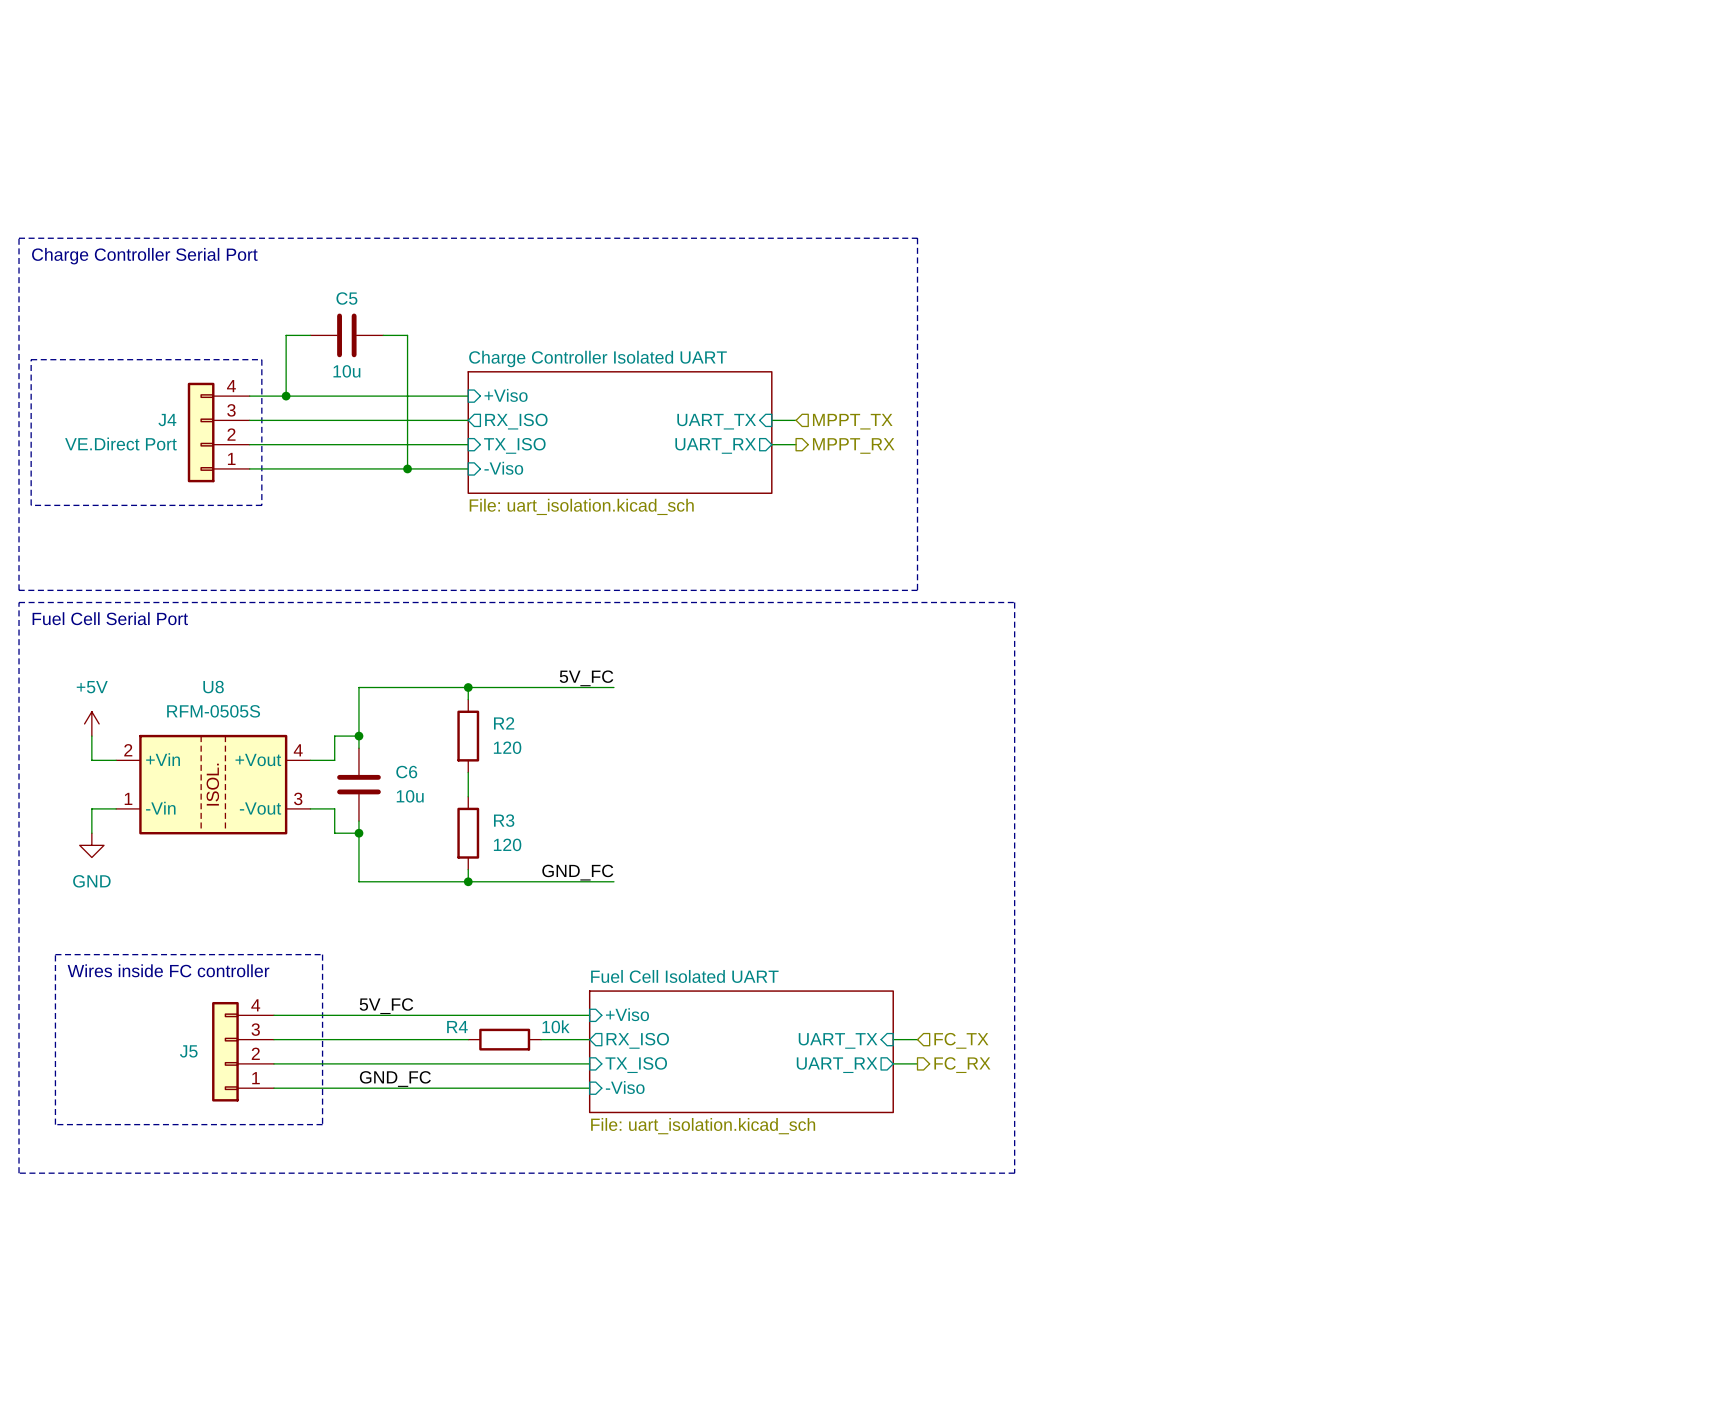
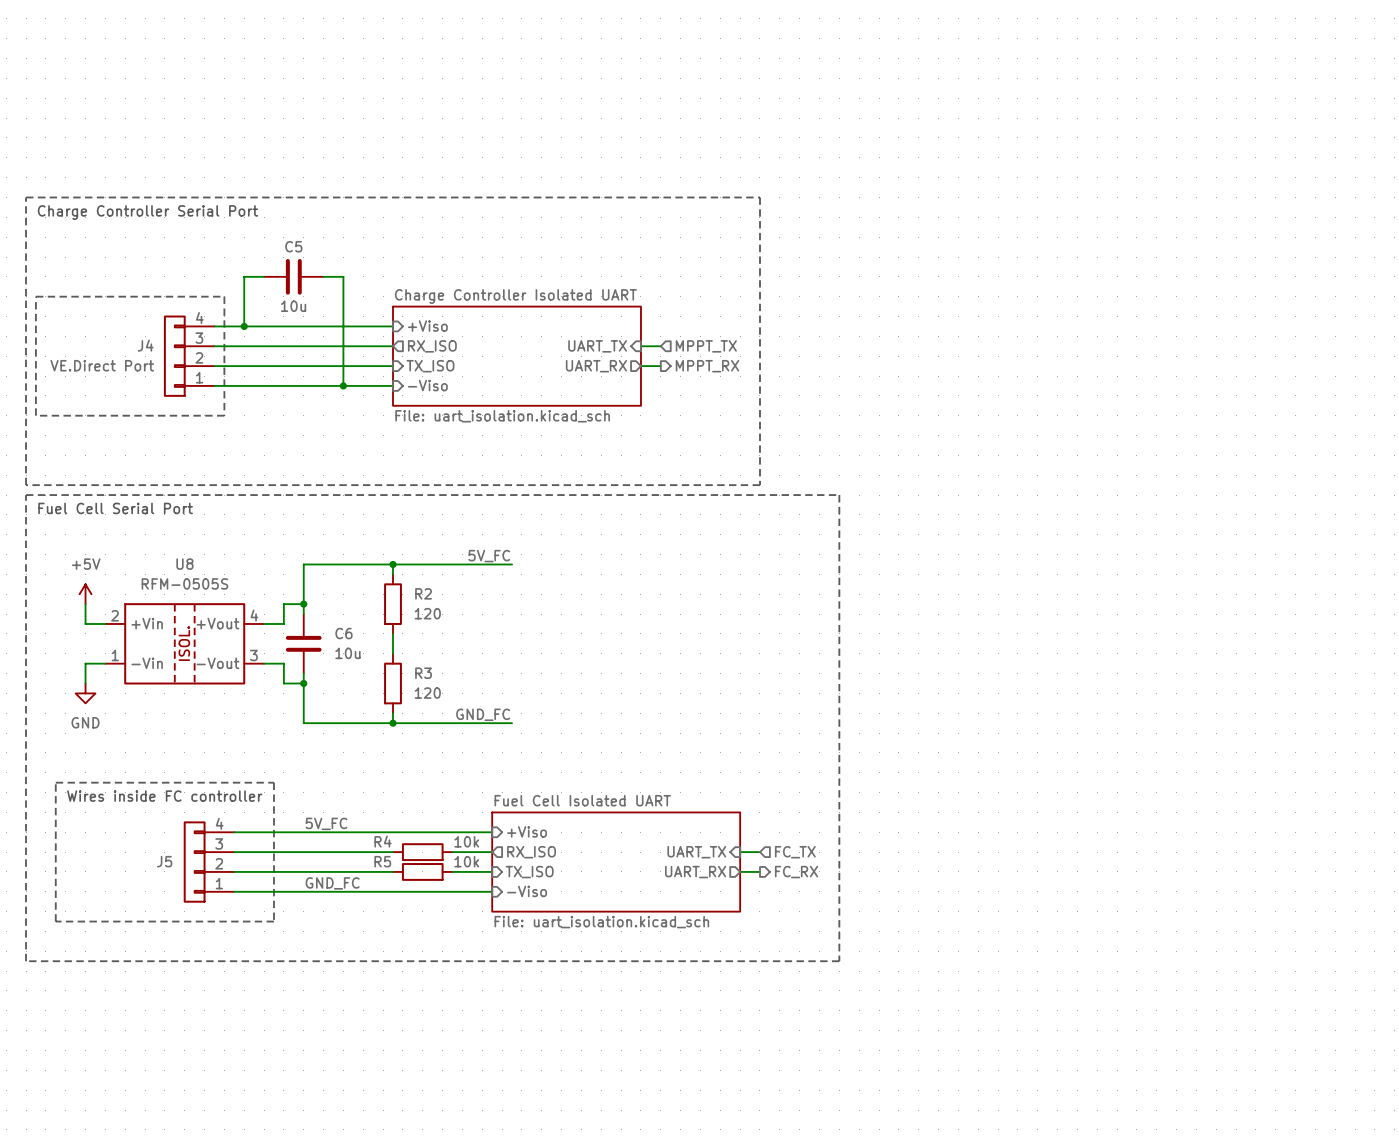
wire: (468, 1063) (541, 1063) -> none
R5: none -> 10k (422, 871)

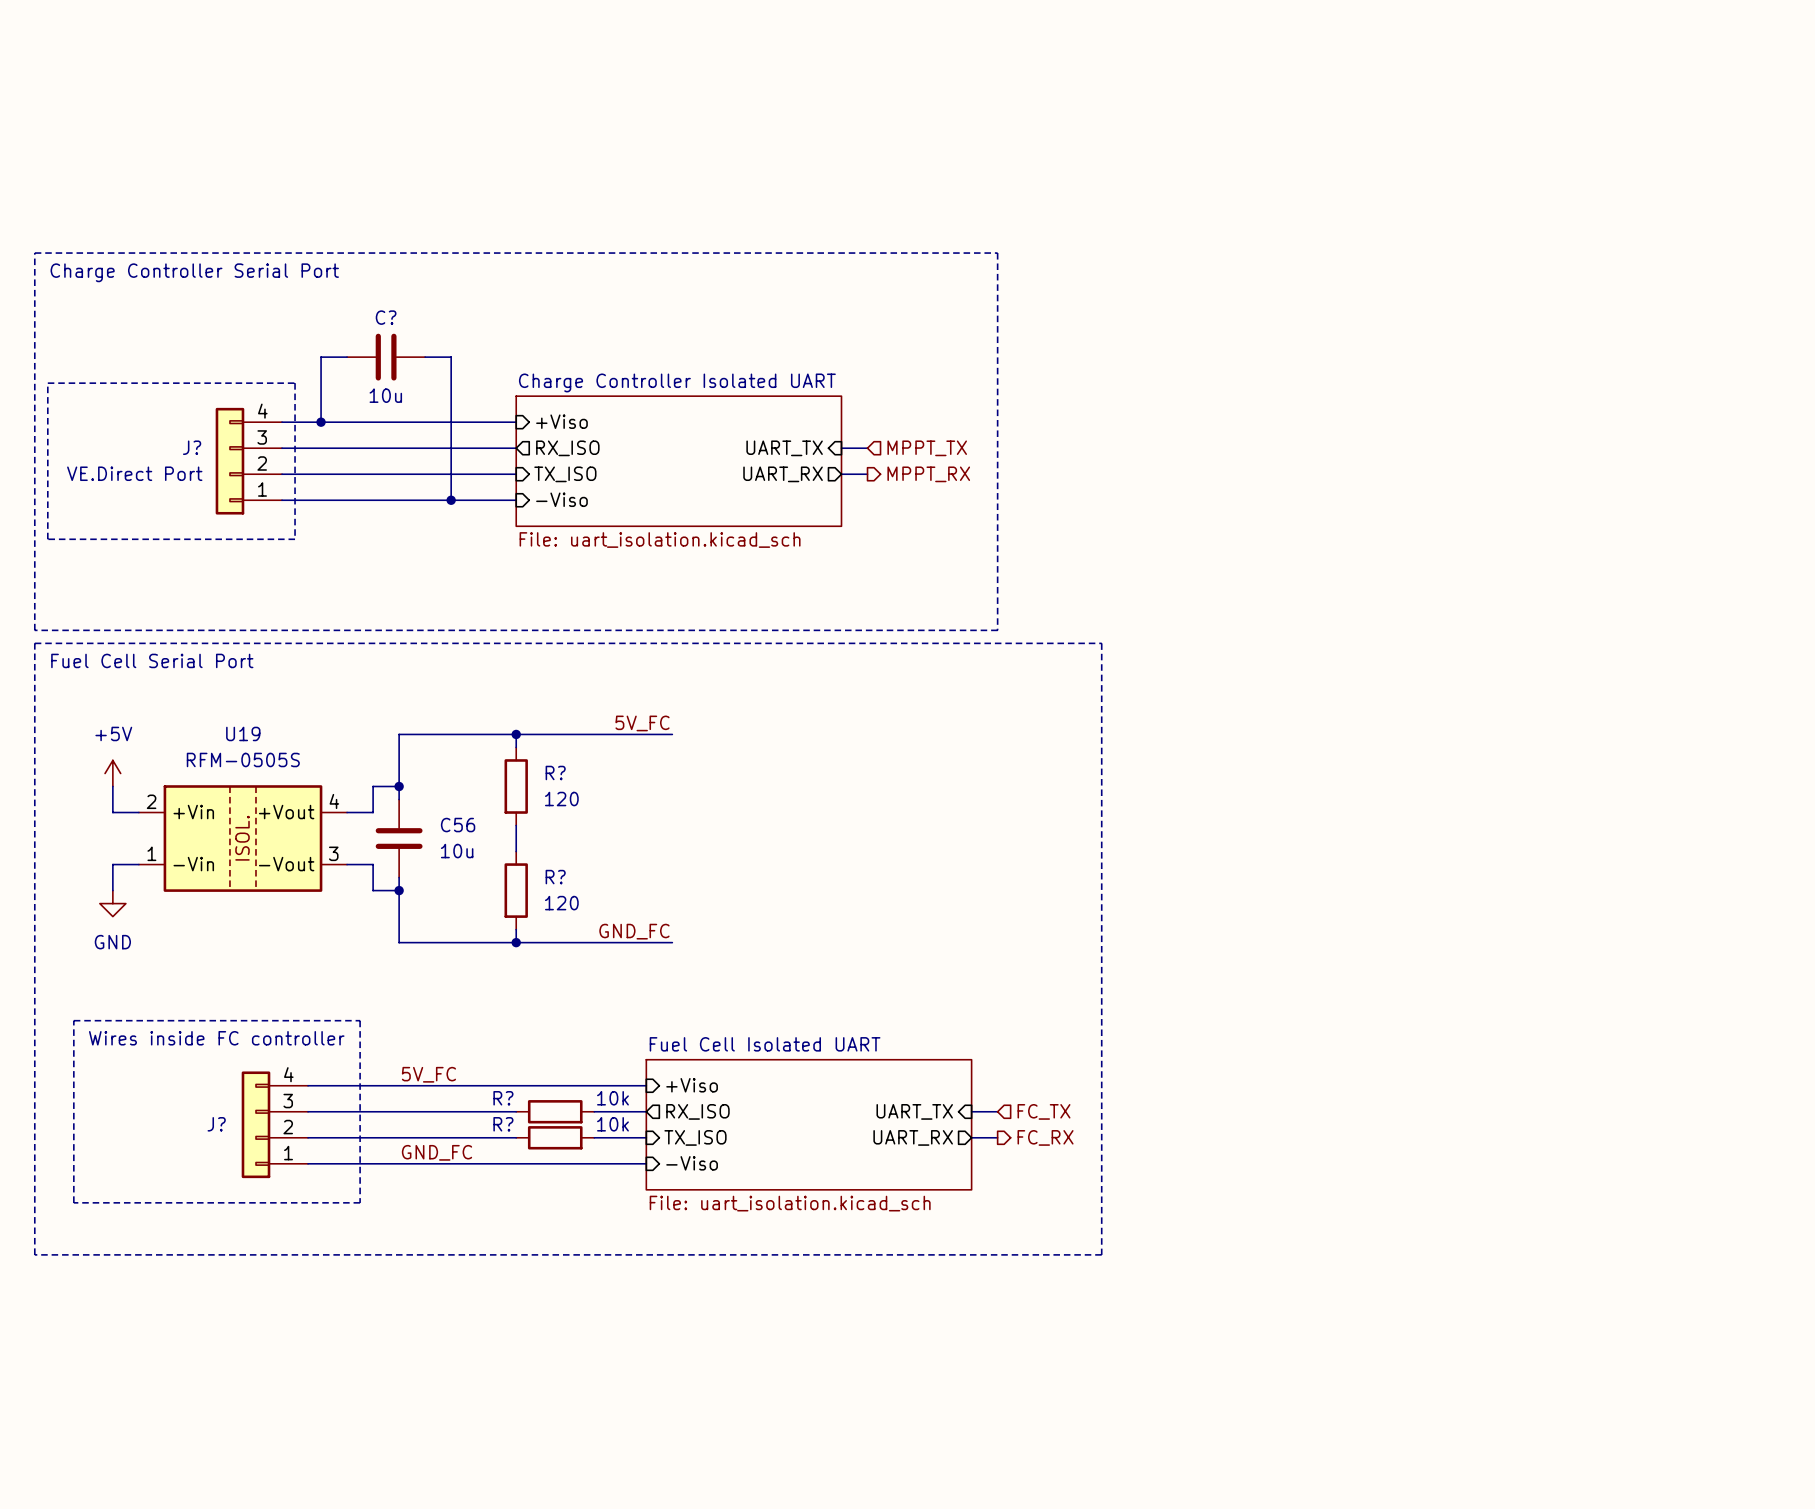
C5 name: C5 (293, 246) -> C? (386, 317)
J4 name: J4 (145, 345) -> J? (192, 447)
U8 name: U8 (184, 564) -> U19 (243, 733)
R2 name: R2 (423, 593) -> R? (555, 772)
C6 name: C6 (343, 633) -> C56 (458, 825)
R3 name: R3 (423, 673) -> R? (555, 877)
R4 name: R4 (383, 841) -> R? (503, 1098)
J5 name: J5 (164, 861) -> J? (216, 1124)
R5 name: R5 (382, 861) -> R? (503, 1124)

